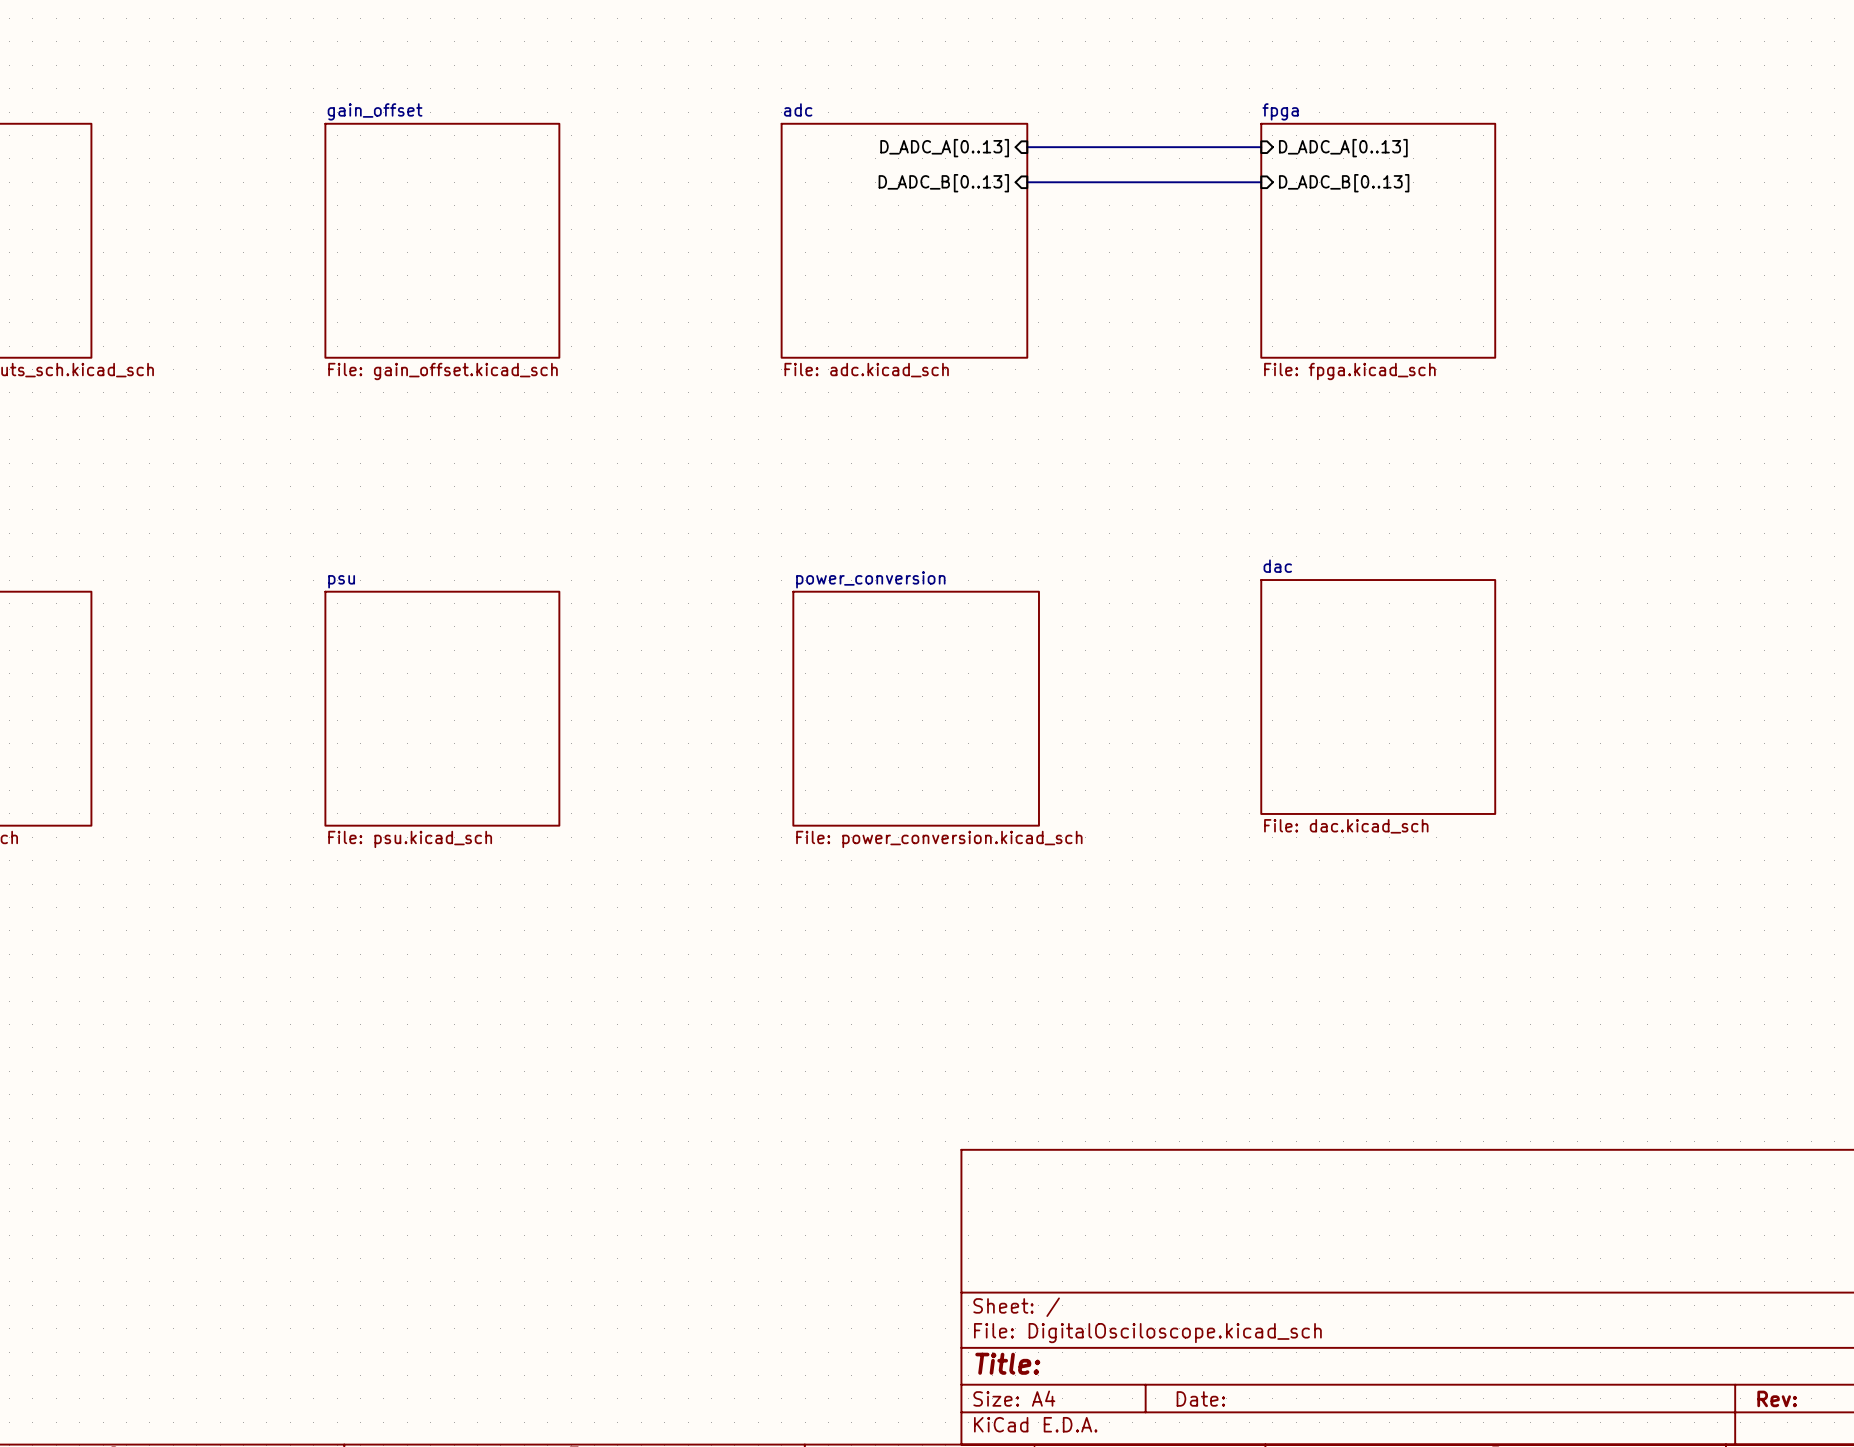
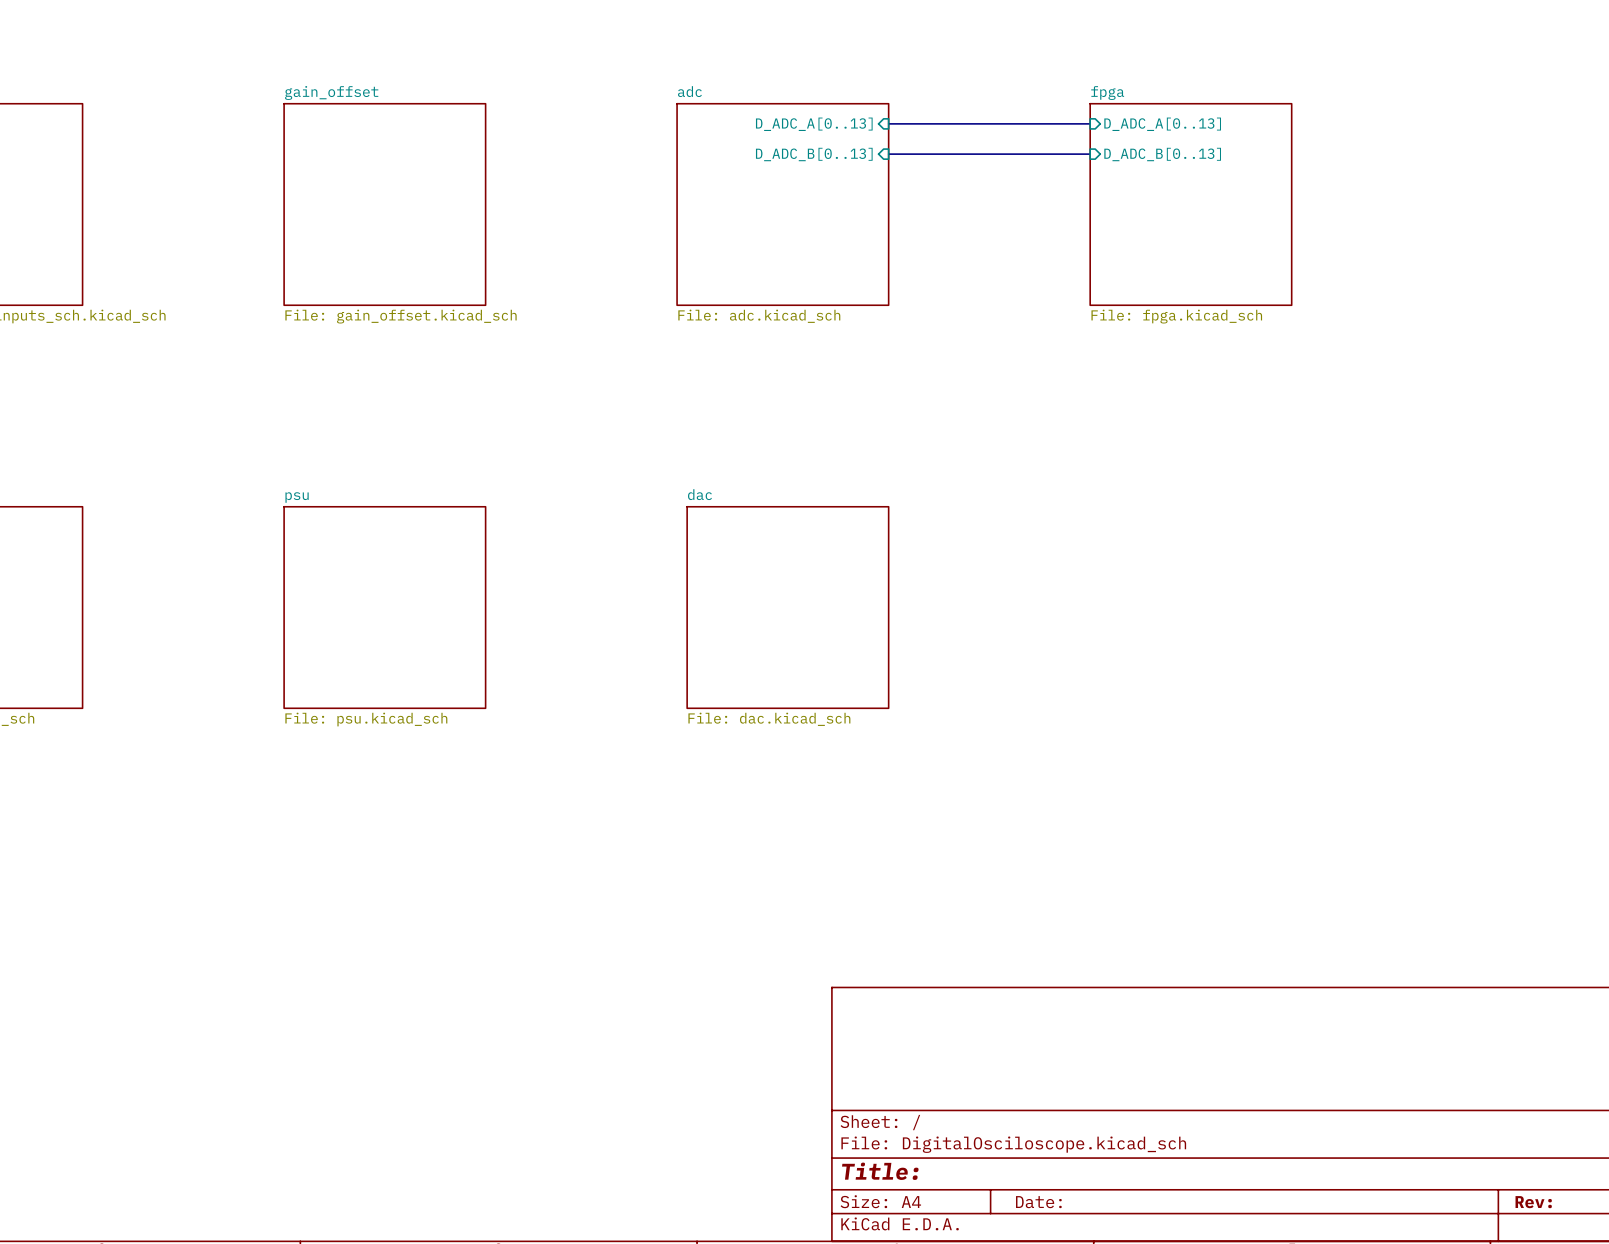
sheet dac: File: dac.kicad_sch (1378, 696) -> none
sheet dac: none -> File: dac.kicad_sch (787, 607)
sheet power_conversion: File: power_conversion.kicad_sch (916, 708) -> none

